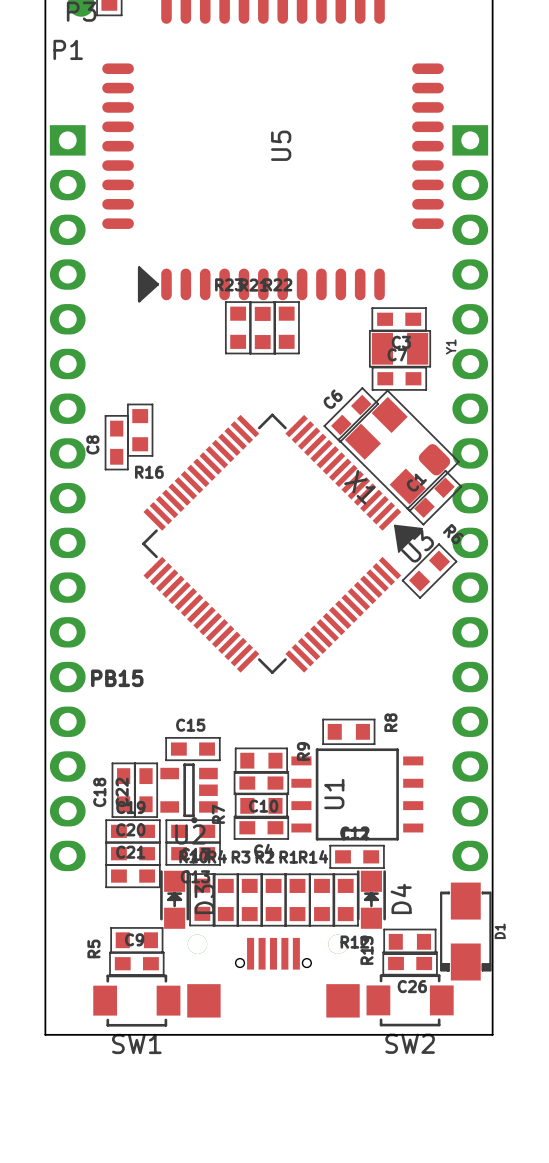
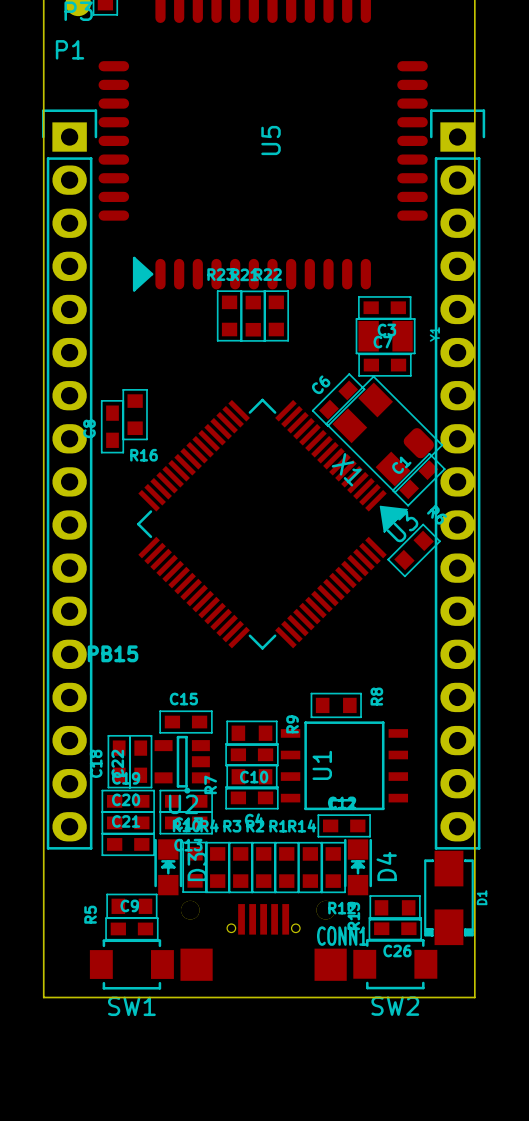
P1 footprint: [49, 125, 86, 872] -> [42, 109, 98, 850]
part footprint: [452, 125, 489, 872] -> [430, 109, 486, 850]
CONN1 name: none -> CONN1 (342, 936)

